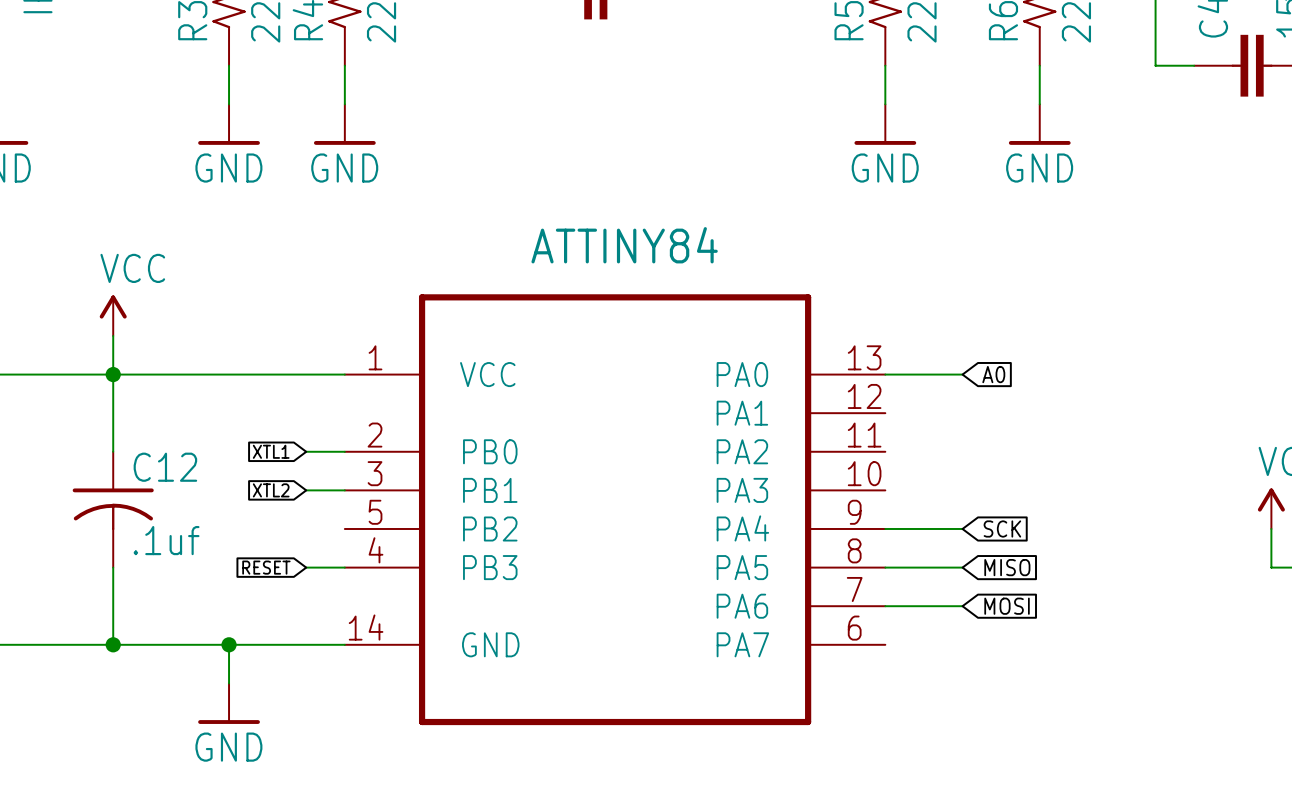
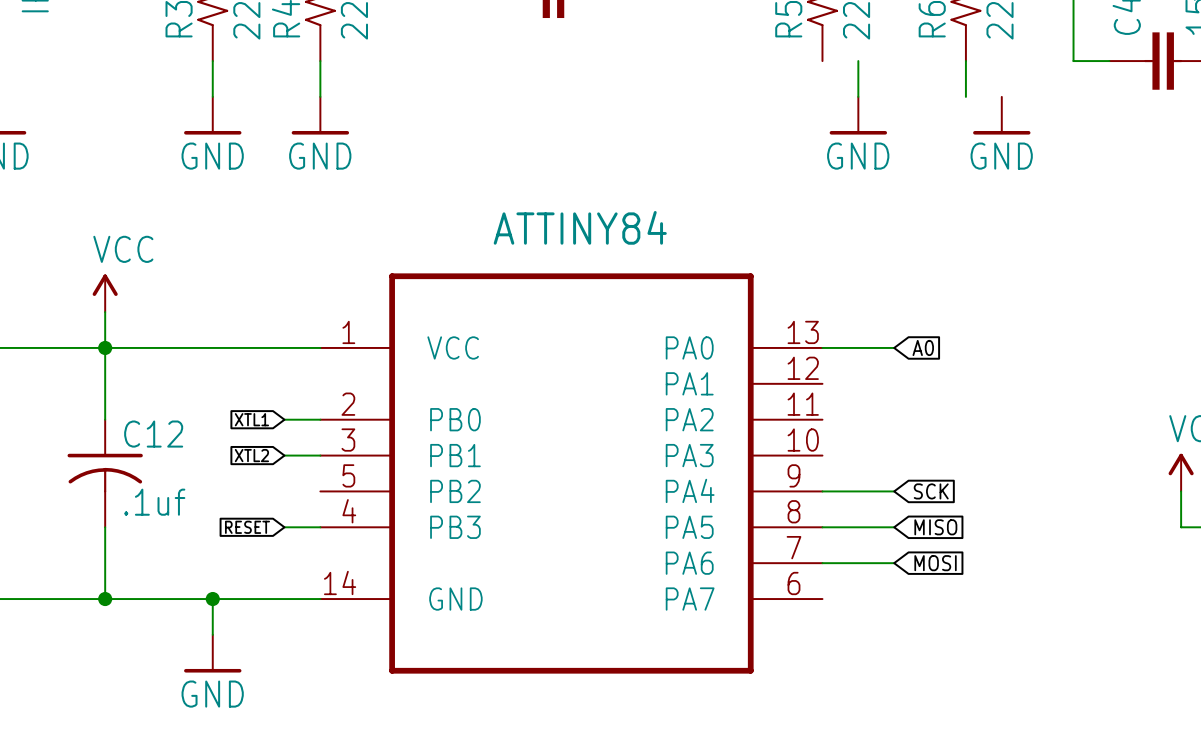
wire: (885, 65) (885, 104) -> (858, 61) (858, 96)
power symbol position: GND (885, 124) -> GND (858, 115)
power symbol position: GND (1039, 124) -> GND (1001, 115)

